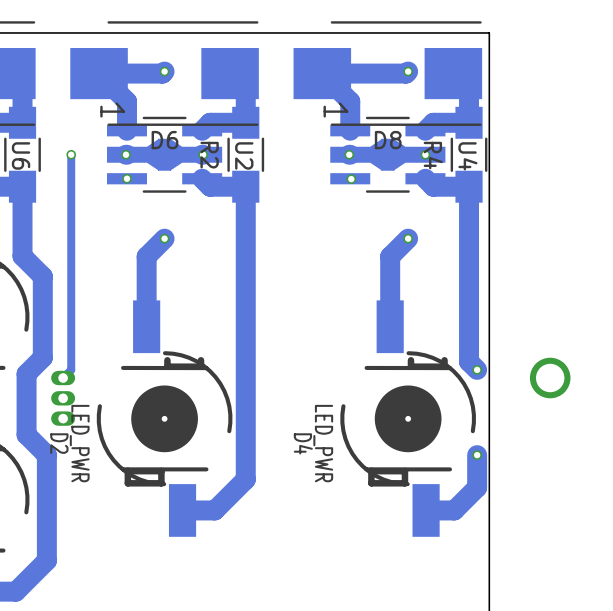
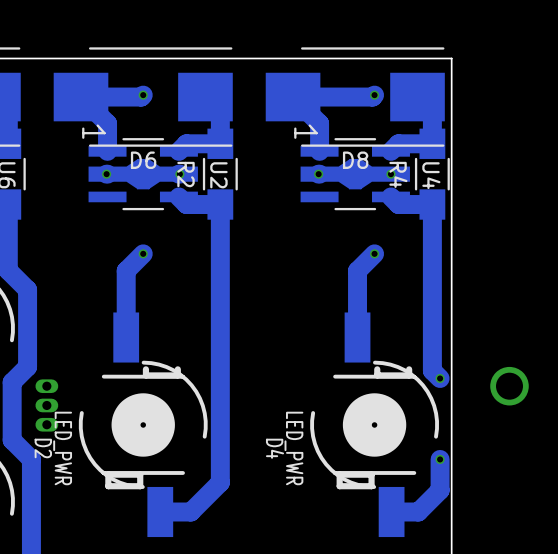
track: (71, 154) (71, 369) (63, 378) -> none
via: (71, 154) -> none
via: (127, 178) -> none
via: (351, 179) -> none

